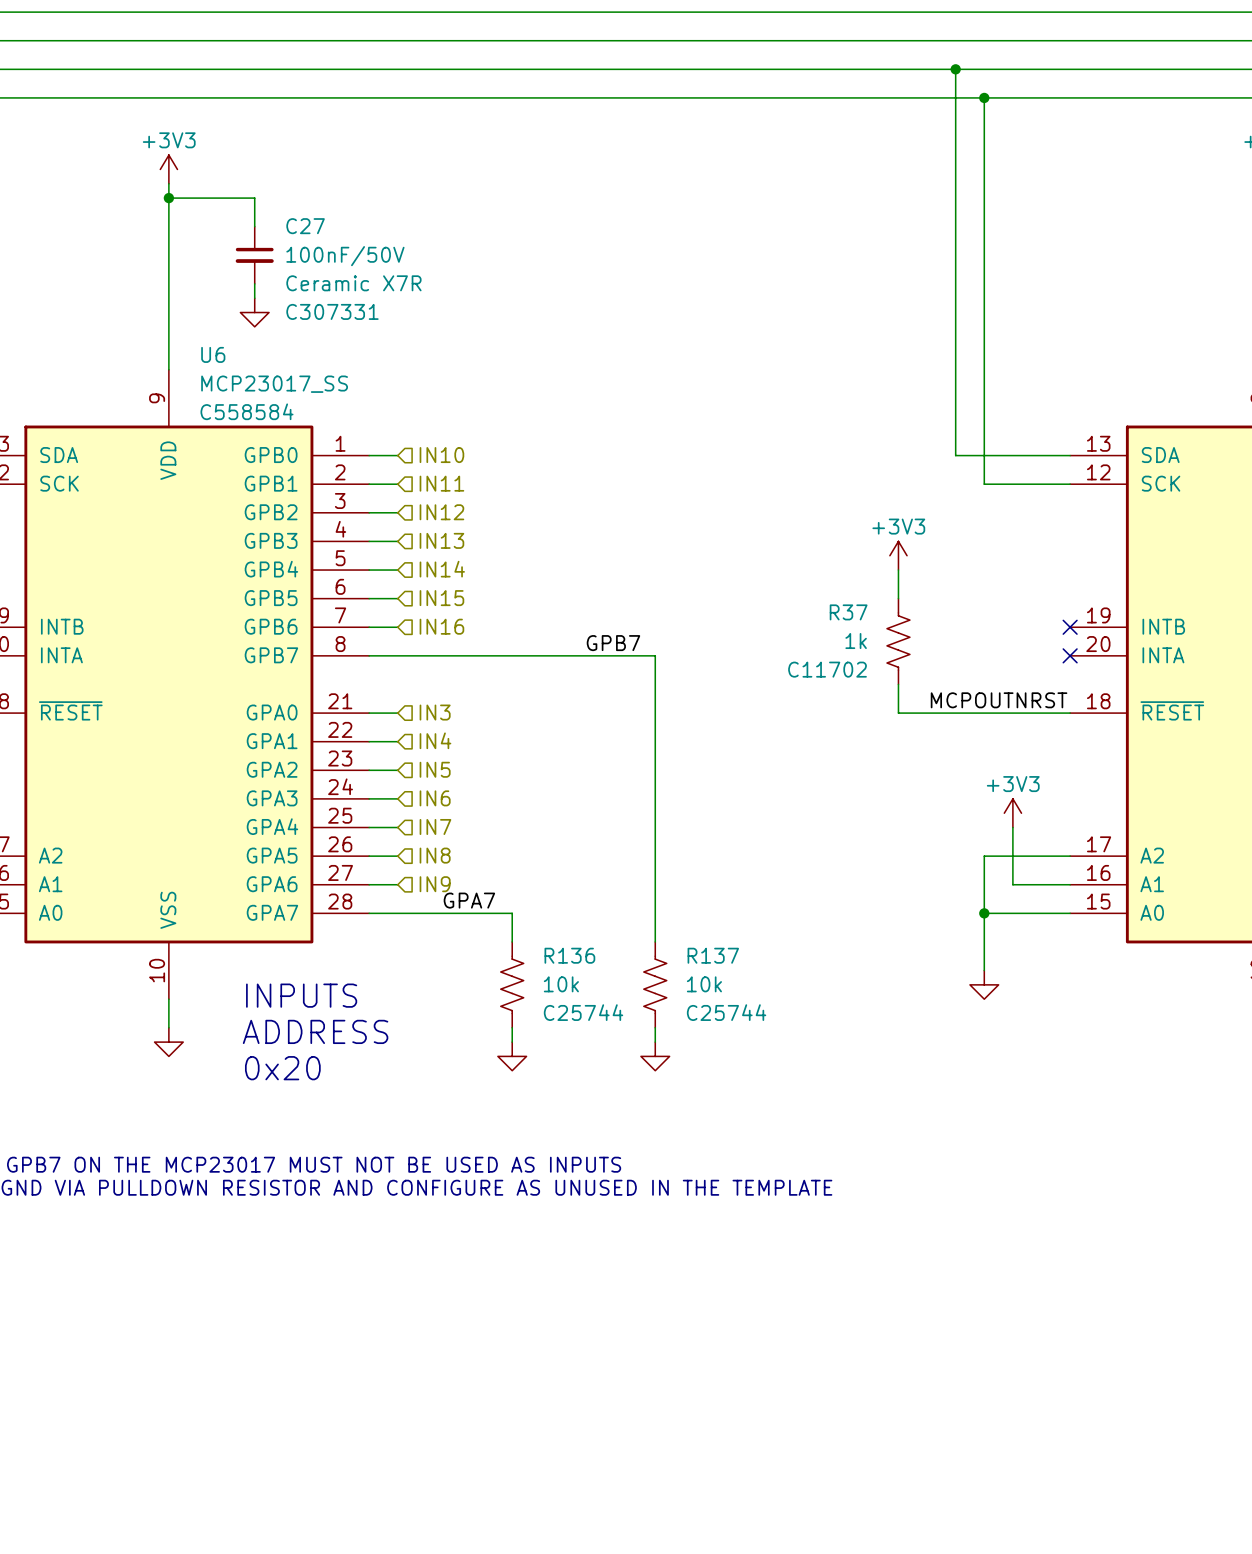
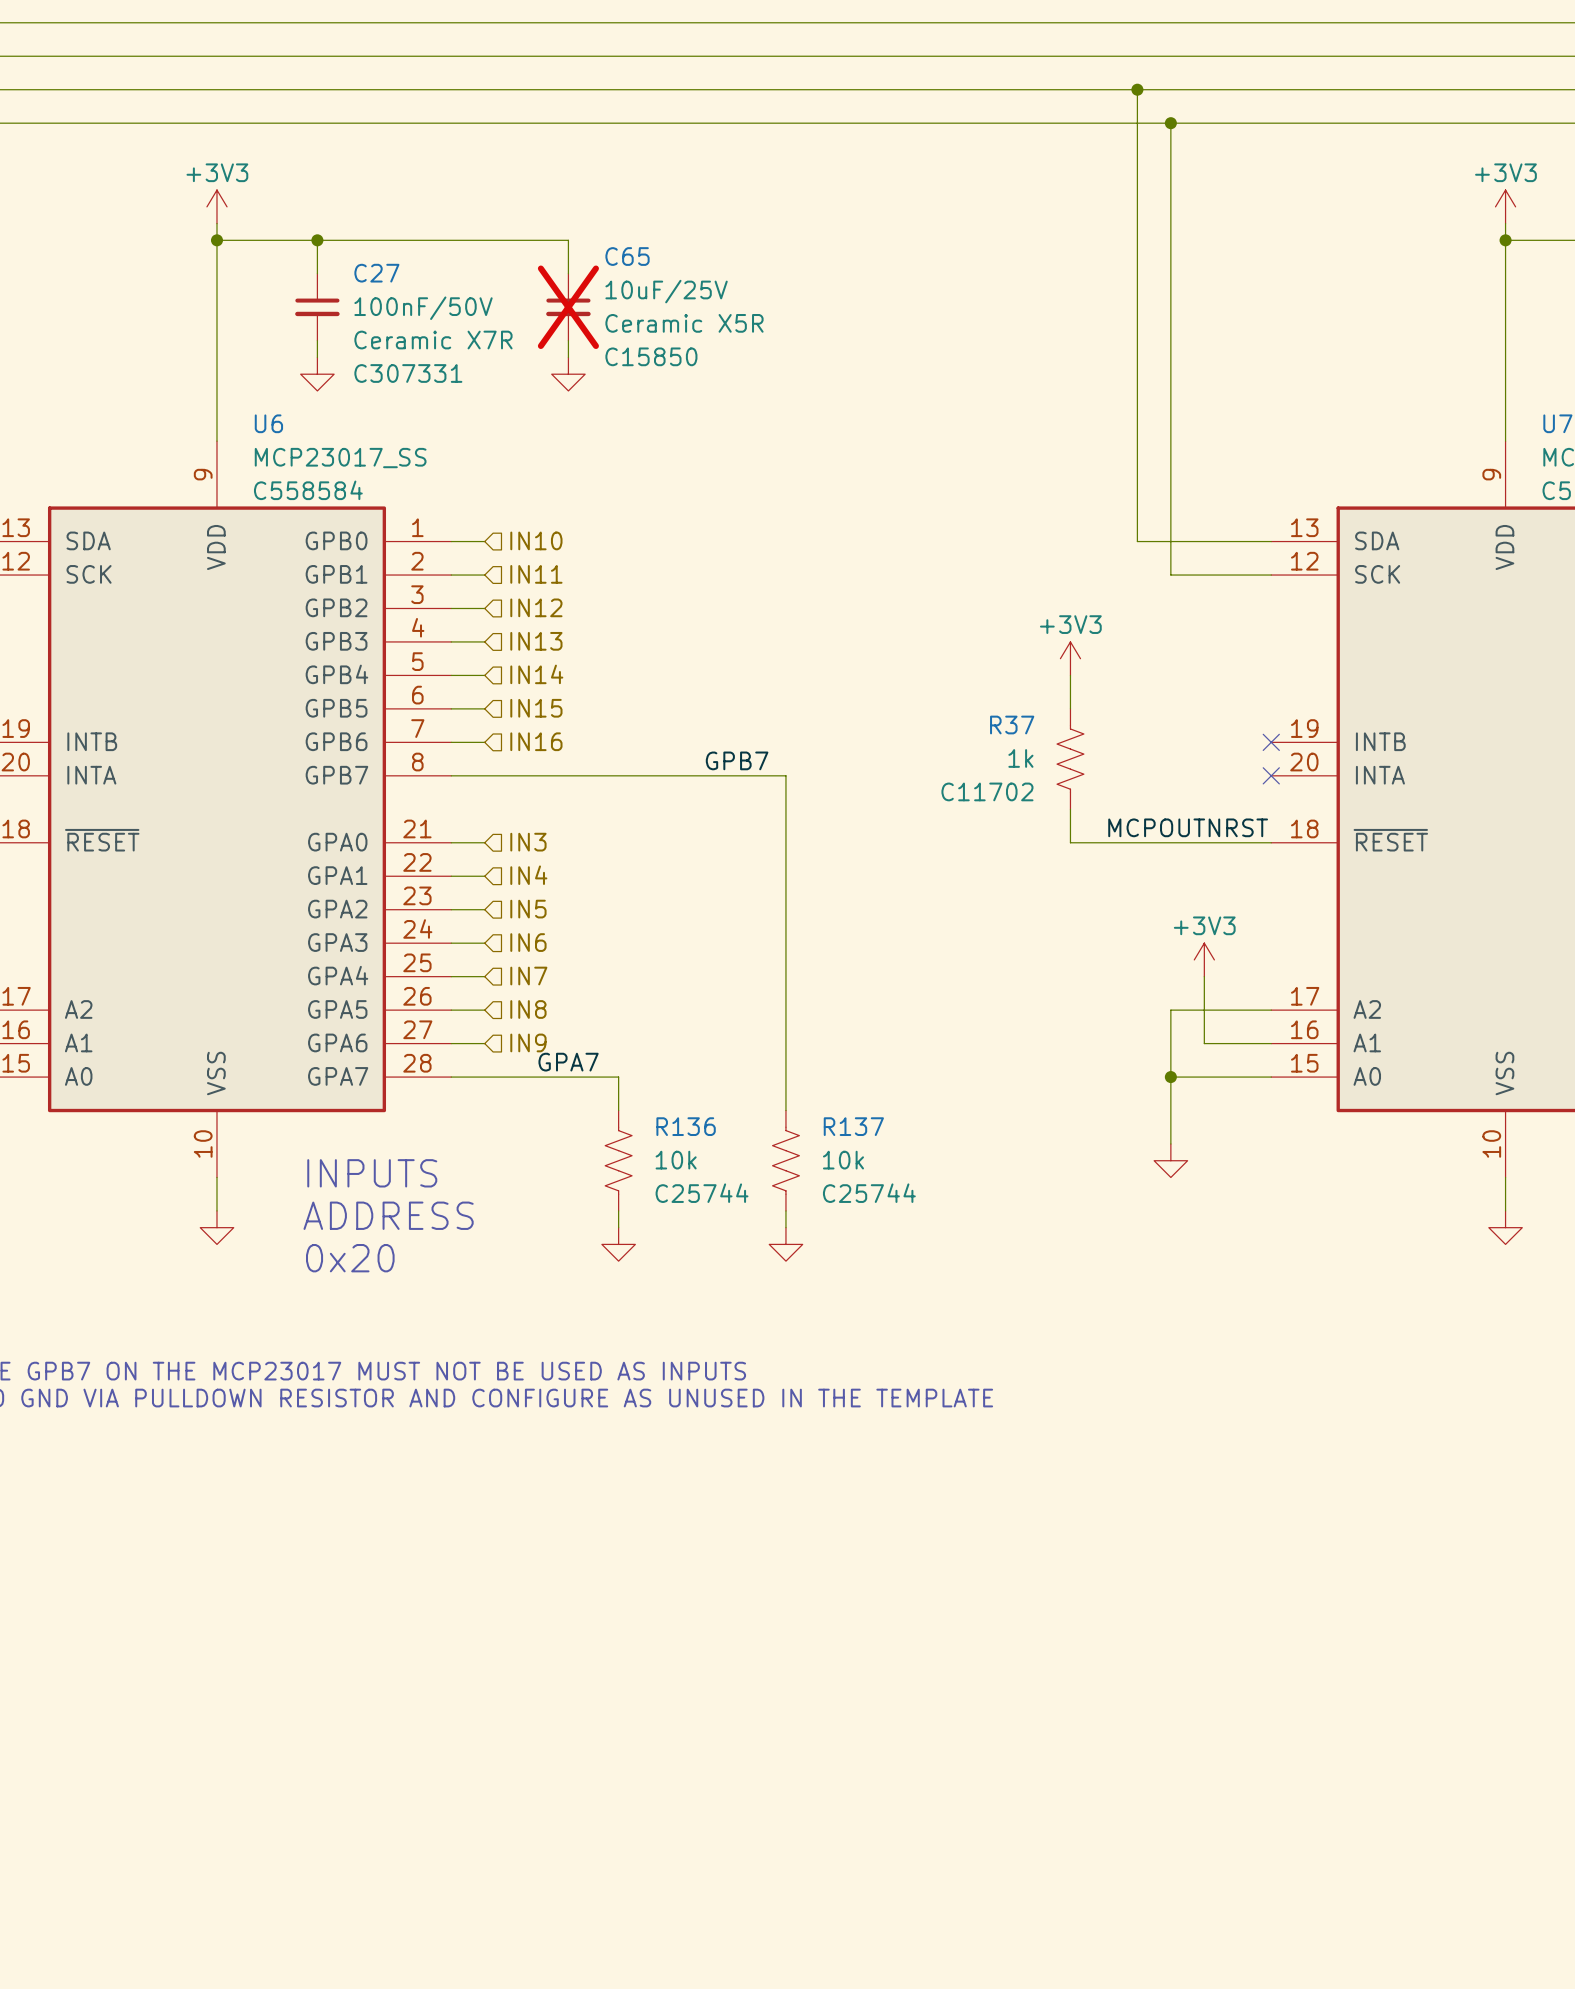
wire: none -> (317, 240) (568, 240) (568, 273)
junction: none -> (317, 240)
C65: none -> 10uF/25V (568, 307)
wire: none -> (568, 340) (568, 357)
power symbol: none -> (568, 374)

